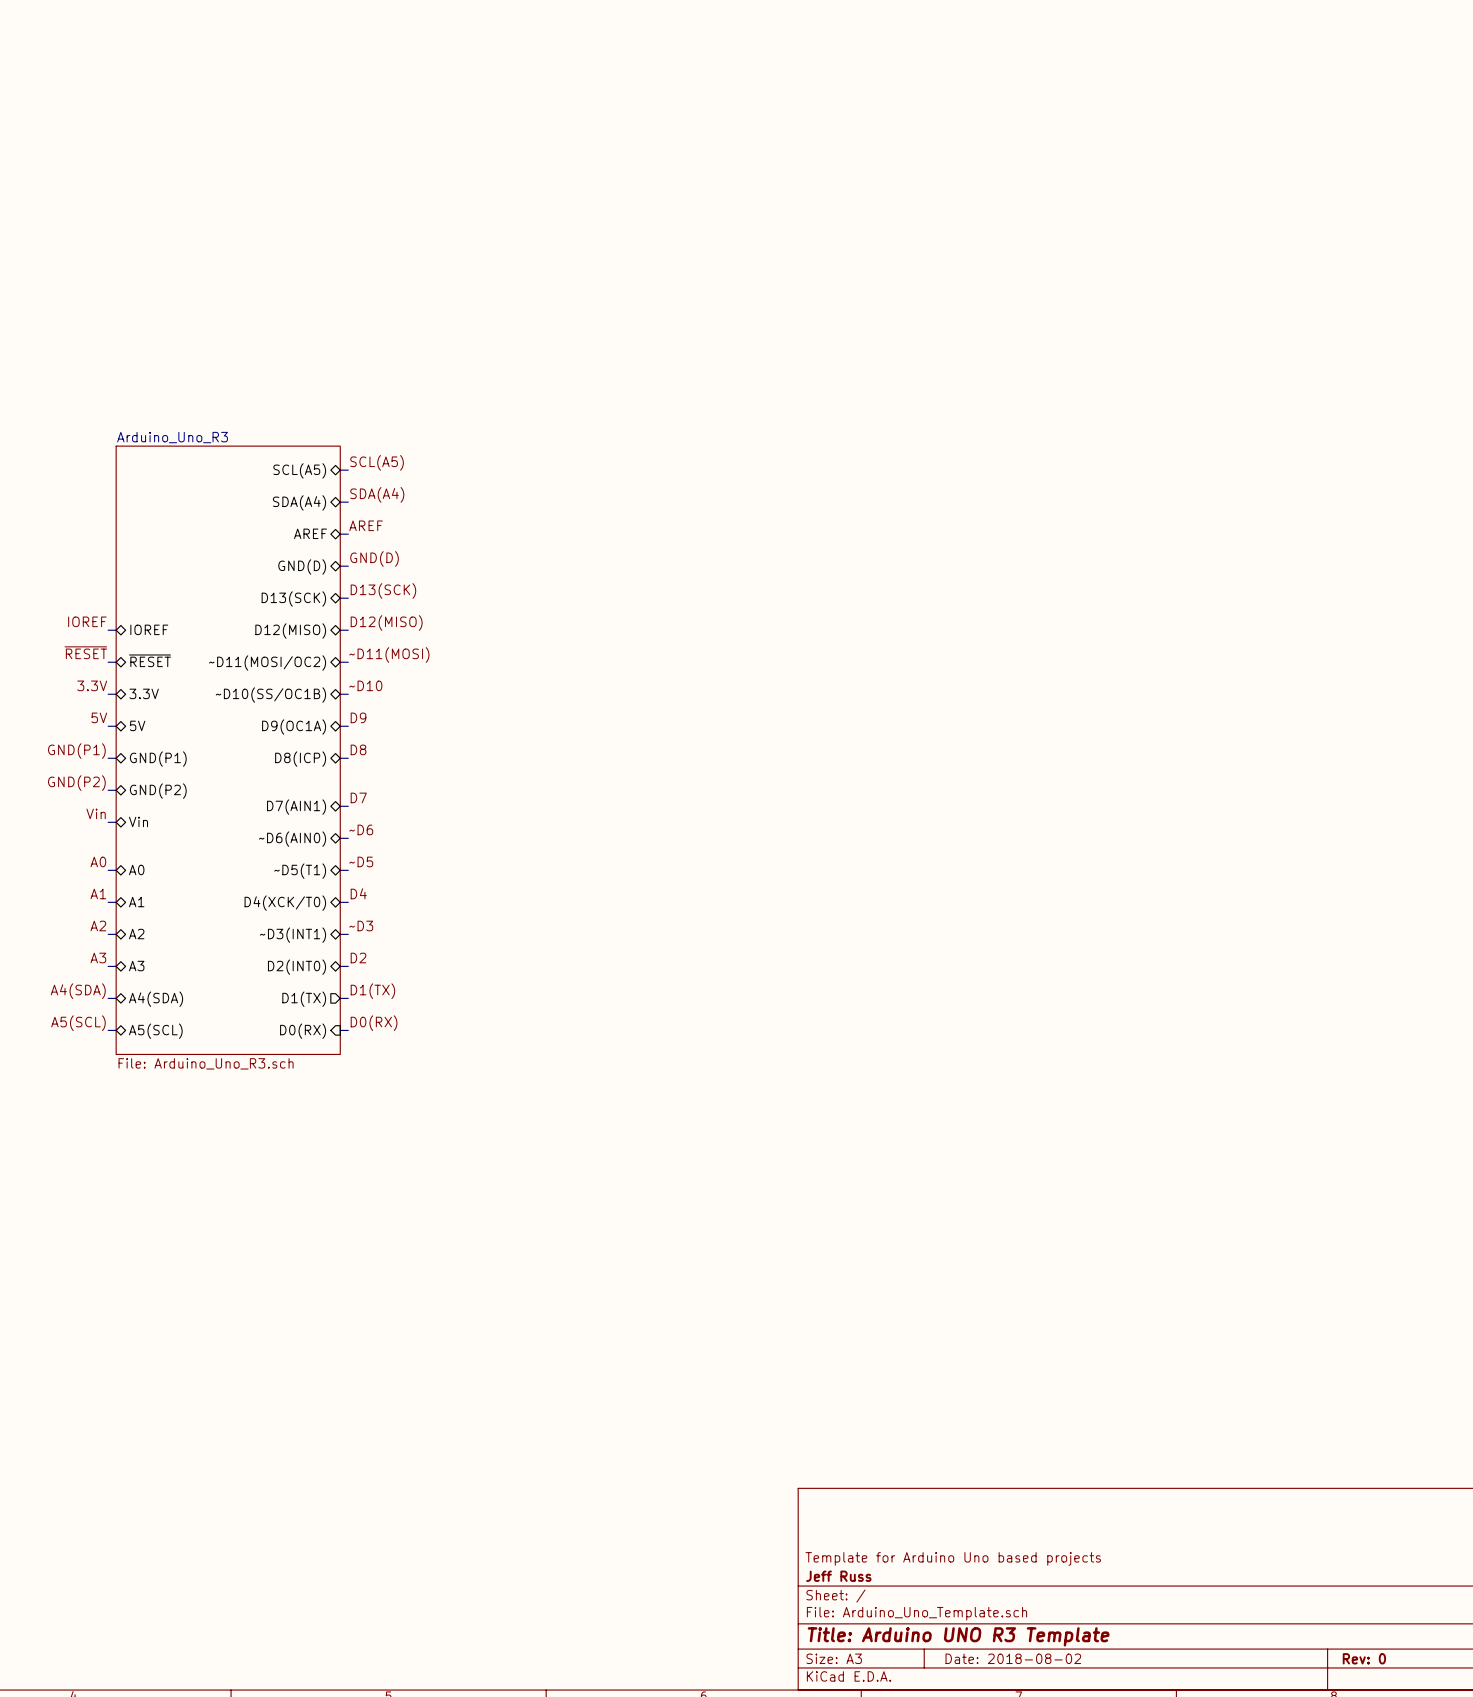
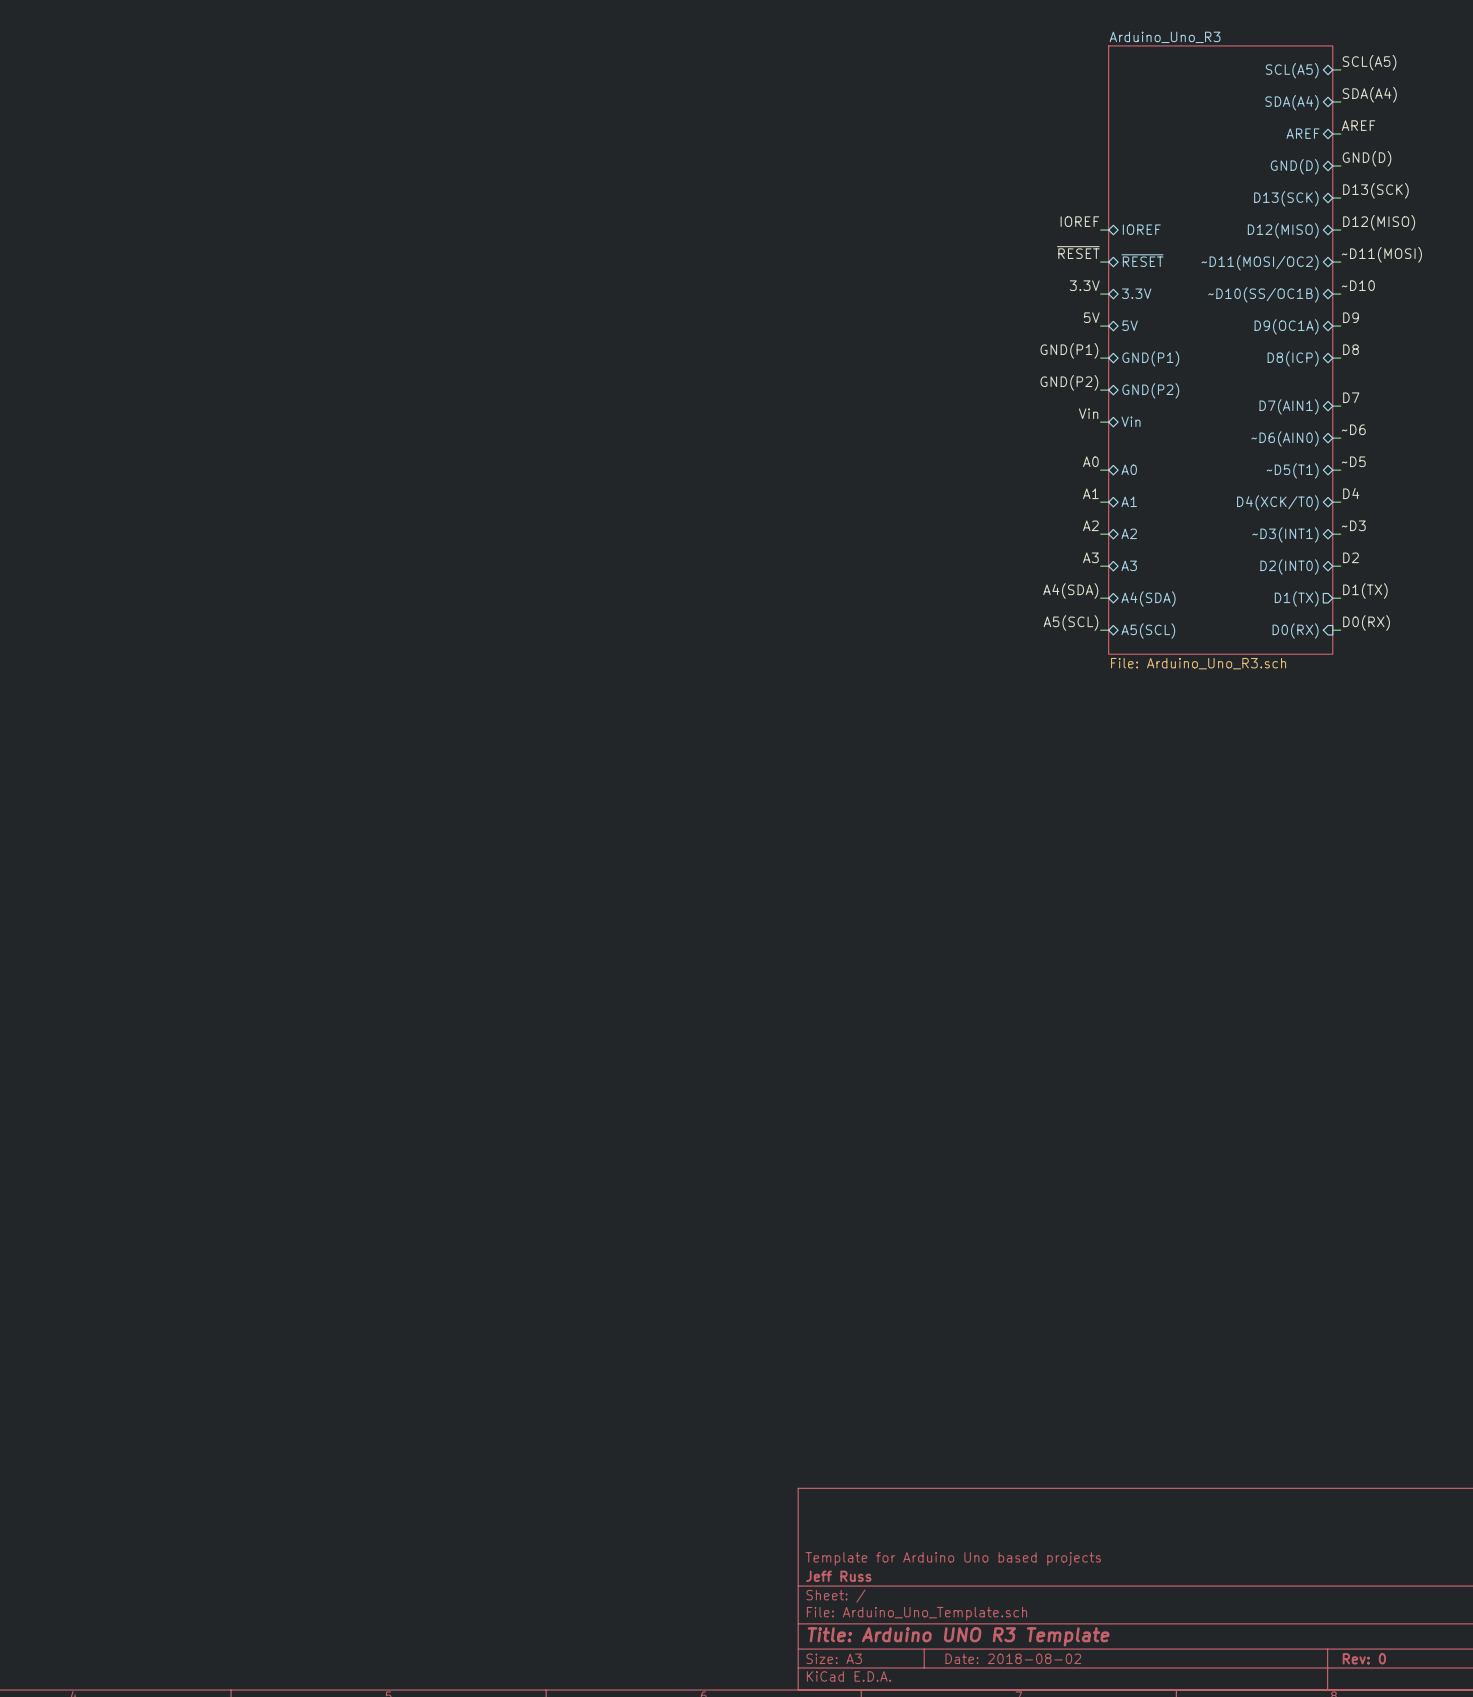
label: none -> SCL(A5) (1369, 62)
wire: none -> (1332, 69) (1340, 69)
sheet pin: none -> SCL(A5) (1292, 70)
label: none -> SDA(A4) (1369, 94)
wire: none -> (1332, 101) (1340, 101)
sheet pin: none -> SDA(A4) (1291, 102)
label: none -> AREF (1358, 125)
sheet pin: none -> AREF (1303, 133)
wire: none -> (1332, 133) (1340, 133)
label: none -> GND(D) (1367, 158)
wire: none -> (1332, 165) (1340, 165)
sheet pin: none -> GND(D) (1294, 166)
label: none -> D13(SCK) (1375, 190)
sheet pin: none -> D13(SCK) (1286, 198)
wire: none -> (1332, 198) (1340, 198)
label: none -> IOREF (1079, 221)
label: none -> D12(MISO) (1379, 222)
sheet pin: none -> IOREF (1141, 229)
wire: none -> (1100, 230) (1108, 230)
sheet pin: none -> D12(MISO) (1283, 230)
wire: none -> (1332, 230) (1340, 230)
label: none -> ~{RESET} (1078, 252)
label: none -> ~D11(MOSI) (1381, 254)
sheet pin: none -> ~{RESET} (1142, 260)
wire: none -> (1100, 262) (1108, 262)
sheet pin: none -> ~D11(MOSI/OC2) (1260, 262)
wire: none -> (1332, 262) (1340, 262)
label: none -> 3.3V (1084, 285)
label: none -> ~D10 (1358, 285)
sheet pin: none -> 3.3V (1136, 293)
wire: none -> (1100, 294) (1108, 294)
sheet pin: none -> ~D10(SS/OC1B) (1263, 294)
wire: none -> (1332, 294) (1340, 294)
label: none -> 5V (1091, 317)
label: none -> D9 (1351, 317)
sheet pin: none -> 5V (1130, 325)
wire: none -> (1100, 326) (1108, 326)
sheet pin: none -> D9(OC1A) (1286, 326)
wire: none -> (1332, 326) (1340, 326)
label: none -> D8 (1351, 349)
label: none -> GND(P1) (1069, 350)
wire: none -> (1100, 358) (1108, 358)
sheet pin: none -> GND(P1) (1150, 358)
sheet pin: none -> D8(ICP) (1293, 358)
wire: none -> (1332, 358) (1340, 358)
label: none -> GND(P2) (1069, 382)
wire: none -> (1100, 390) (1108, 390)
sheet pin: none -> GND(P2) (1150, 390)
label: none -> D7 (1351, 397)
sheet pin: none -> D7(AIN1) (1289, 406)
wire: none -> (1332, 406) (1340, 406)
label: none -> Vin (1088, 413)
sheet pin: none -> Vin (1131, 421)
wire: none -> (1100, 422) (1108, 422)
label: none -> ~D6 (1353, 429)
sheet pin: none -> ~D6(AIN0) (1285, 438)
wire: none -> (1332, 438) (1340, 438)
label: none -> A0 (1090, 461)
label: none -> ~D5 (1353, 461)
label: SCL(A5) (377, 462) -> none
sheet pin: none -> A0 (1129, 469)
sheet pin: SCL(A5) (299, 470) -> none
wire: (340, 470) (348, 470) -> none
wire: none -> (1100, 470) (1108, 470)
sheet pin: none -> ~D5(T1) (1292, 470)
wire: none -> (1332, 470) (1340, 470)
label: none -> A1 (1090, 493)
label: none -> D4 (1351, 493)
label: SDA(A4) (377, 494) -> none
sheet pin: none -> A1 (1129, 501)
sheet pin: SDA(A4) (299, 502) -> none
wire: (340, 502) (348, 502) -> none
wire: none -> (1100, 502) (1108, 502)
sheet pin: none -> D4(XCK/T0) (1277, 502)
wire: none -> (1332, 502) (1340, 502)
label: AREF (366, 525) -> none
label: none -> A2 (1090, 525)
label: none -> ~D3 (1353, 525)
sheet pin: AREF (310, 533) -> none
sheet pin: none -> A2 (1129, 533)
wire: (340, 534) (348, 534) -> none
wire: none -> (1100, 534) (1108, 534)
sheet pin: none -> ~D3(INT1) (1285, 534)
wire: none -> (1332, 534) (1340, 534)
label: none -> A3 (1090, 557)
label: none -> D2 (1351, 557)
label: GND(D) (374, 558) -> none
sheet pin: none -> A3 (1129, 565)
sheet pin: GND(D) (302, 566) -> none
wire: (340, 566) (348, 566) -> none
wire: none -> (1100, 566) (1108, 566)
sheet pin: none -> D2(INT0) (1289, 566)
wire: none -> (1332, 566) (1340, 566)
label: D13(SCK) (383, 590) -> none
label: none -> A4(SDA) (1070, 590)
label: none -> D1(TX) (1365, 590)
sheet pin: D13(SCK) (293, 598) -> none
wire: (340, 598) (348, 598) -> none
wire: none -> (1100, 598) (1108, 598)
sheet pin: none -> A4(SDA) (1148, 598)
sheet pin: none -> D1(TX) (1296, 598)
wire: none -> (1332, 598) (1340, 598)
label: IOREF (87, 621) -> none
label: D12(MISO) (386, 622) -> none
label: none -> A5(SCL) (1070, 622)
label: none -> D0(RX) (1366, 622)
sheet pin: IOREF (149, 629) -> none
wire: (108, 630) (116, 630) -> none
sheet pin: D12(MISO) (290, 630) -> none
wire: (340, 630) (348, 630) -> none
wire: none -> (1100, 630) (1108, 630)
sheet pin: none -> A5(SCL) (1148, 630)
sheet pin: none -> D0(RX) (1295, 630)
wire: none -> (1332, 630) (1340, 630)
label: ~{RESET} (85, 652) -> none
label: ~D11(MOSI) (389, 655) -> none
sheet pin: ~{RESET} (150, 660) -> none
wire: (108, 662) (116, 662) -> none
wire: (340, 662) (348, 662) -> none
sheet pin: ~D11(MOSI/OC2) (267, 663) -> none
label: 3.3V (92, 685) -> none
label: ~D10 (365, 685) -> none
sheet pin: 3.3V (144, 693) -> none
wire: (108, 694) (116, 694) -> none
wire: (340, 694) (348, 694) -> none
sheet pin: ~D10(SS/OC1B) (270, 695) -> none
label: 5V (99, 717) -> none
label: D9 (358, 717) -> none
sheet pin: 5V (137, 725) -> none
wire: (108, 726) (116, 726) -> none
wire: (340, 726) (348, 726) -> none
sheet pin: D9(OC1A) (294, 727) -> none
label: D8 (358, 749) -> none
sheet Arduino_Uno_R3 position: (228, 750) -> (1220, 350)
label: GND(P1) (76, 751) -> none
wire: (108, 758) (116, 758) -> none
wire: (340, 758) (348, 758) -> none
sheet pin: GND(P1) (158, 759) -> none
sheet pin: D8(ICP) (300, 759) -> none
label: GND(P2) (76, 783) -> none
wire: (108, 790) (116, 790) -> none
sheet pin: GND(P2) (158, 791) -> none
label: D7 (358, 797) -> none
wire: (340, 806) (348, 806) -> none
sheet pin: D7(AIN1) (296, 807) -> none
label: Vin (96, 813) -> none
sheet pin: Vin (138, 821) -> none
wire: (108, 822) (116, 822) -> none
label: ~D6 (361, 829) -> none
wire: (340, 838) (348, 838) -> none
sheet pin: ~D6(AIN0) (292, 839) -> none
label: A0 (98, 861) -> none
label: ~D5 (361, 861) -> none
sheet pin: A0 (136, 869) -> none
wire: (108, 870) (116, 870) -> none
wire: (340, 870) (348, 870) -> none
sheet pin: ~D5(T1) (300, 871) -> none
label: A1 (98, 893) -> none
label: D4 (358, 893) -> none
wire: (108, 902) (116, 902) -> none
sheet pin: A1 (136, 902) -> none
wire: (340, 902) (348, 902) -> none
sheet pin: D4(XCK/T0) (285, 903) -> none
label: A2 (98, 925) -> none
label: ~D3 (361, 925) -> none
wire: (108, 934) (116, 934) -> none
sheet pin: A2 (136, 934) -> none
wire: (340, 934) (348, 934) -> none
sheet pin: ~D3(INT1) (292, 935) -> none
label: A3 (98, 958) -> none
label: D2 (358, 958) -> none
wire: (108, 966) (116, 966) -> none
sheet pin: A3 (136, 966) -> none
wire: (340, 966) (348, 966) -> none
sheet pin: D2(INT0) (297, 967) -> none
label: A4(SDA) (78, 991) -> none
label: D1(TX) (372, 991) -> none
wire: (108, 998) (116, 998) -> none
wire: (340, 998) (348, 998) -> none
sheet pin: A4(SDA) (156, 999) -> none
sheet pin: D1(TX) (304, 999) -> none
label: A5(SCL) (78, 1023) -> none
label: D0(RX) (374, 1023) -> none
wire: (108, 1030) (116, 1030) -> none
wire: (340, 1030) (348, 1030) -> none
sheet pin: A5(SCL) (155, 1031) -> none
sheet pin: D0(RX) (303, 1031) -> none

